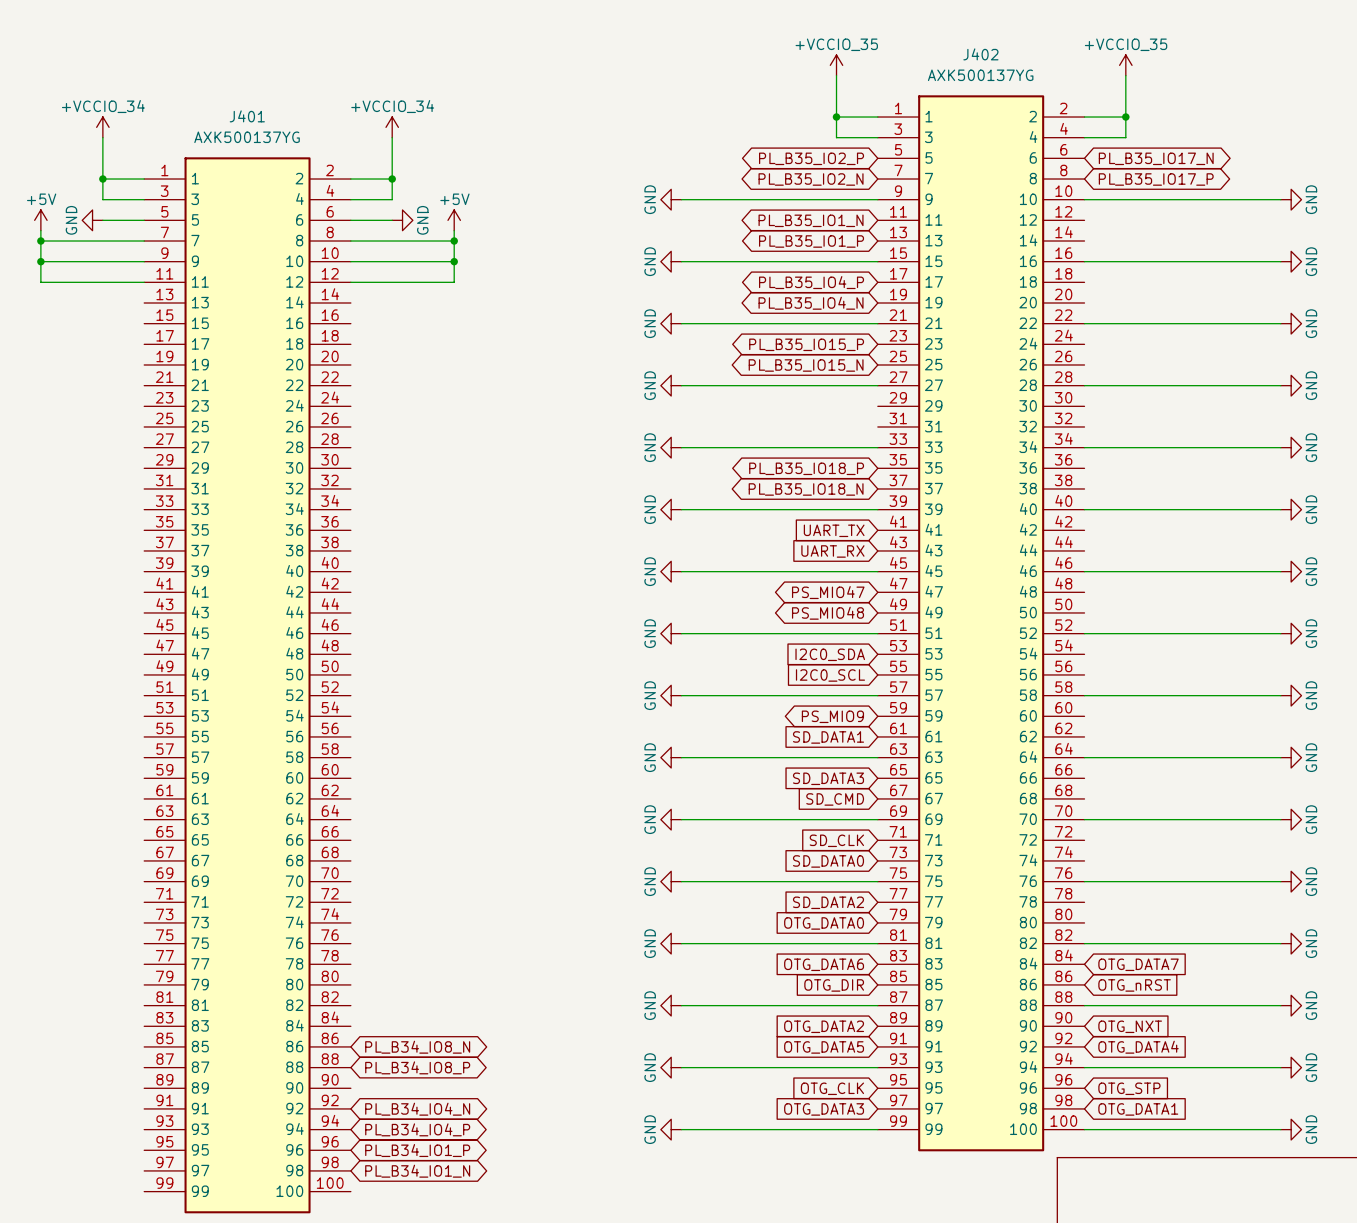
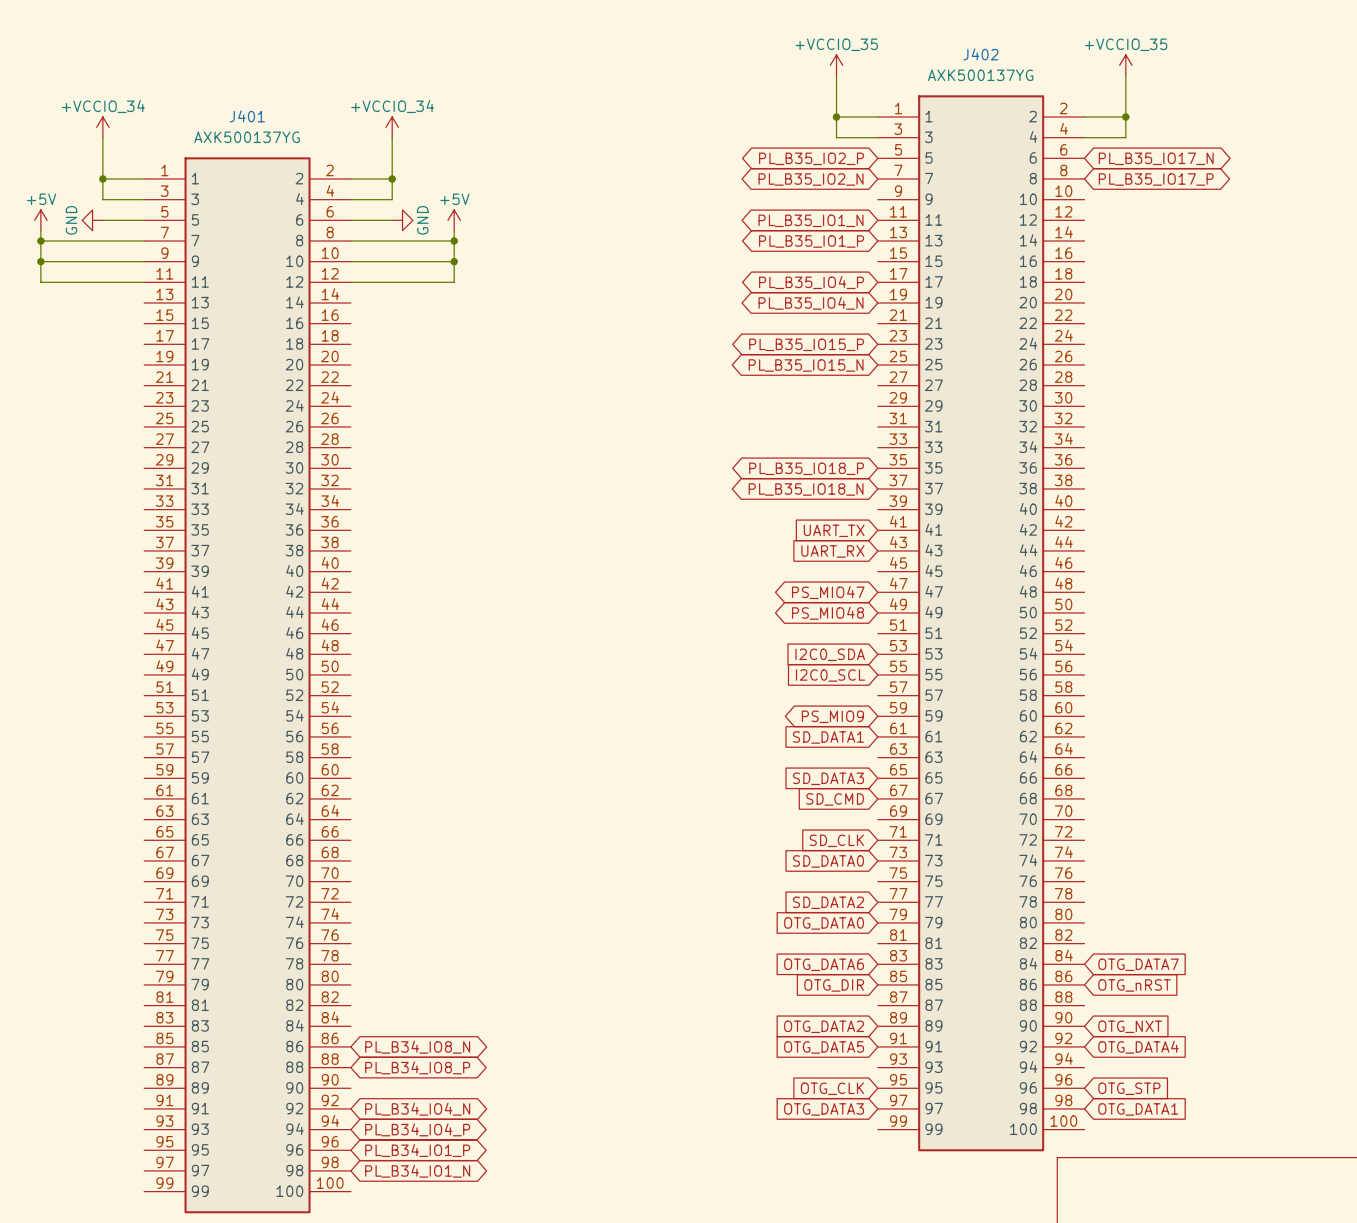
power symbol: GND (671, 199) -> none
wire: (681, 199) (877, 199) -> none
wire: (1084, 199) (1280, 199) -> none
power symbol: GND (1291, 199) -> none
power symbol: GND (671, 261) -> none
wire: (681, 261) (877, 261) -> none
wire: (1084, 261) (1280, 261) -> none
power symbol: GND (1291, 261) -> none
power symbol: GND (671, 323) -> none
wire: (681, 323) (877, 323) -> none
wire: (1084, 323) (1280, 323) -> none
power symbol: GND (1291, 323) -> none
power symbol: GND (671, 385) -> none
wire: (681, 385) (877, 385) -> none
wire: (1084, 385) (1280, 385) -> none
power symbol: GND (1291, 385) -> none
power symbol: GND (671, 447) -> none
wire: (681, 447) (877, 447) -> none
wire: (1084, 447) (1280, 447) -> none
power symbol: GND (1291, 447) -> none
power symbol: GND (671, 509) -> none
wire: (681, 509) (877, 509) -> none
wire: (1084, 509) (1280, 509) -> none
power symbol: GND (1291, 509) -> none
power symbol: GND (671, 571) -> none
wire: (681, 571) (877, 571) -> none
wire: (1084, 571) (1280, 571) -> none
power symbol: GND (1291, 571) -> none
power symbol: GND (671, 633) -> none
wire: (681, 633) (877, 633) -> none
wire: (1084, 633) (1280, 633) -> none
power symbol: GND (1291, 633) -> none
power symbol: GND (671, 695) -> none
wire: (681, 695) (877, 695) -> none
wire: (1084, 695) (1280, 695) -> none
power symbol: GND (1291, 695) -> none
power symbol: GND (671, 757) -> none
wire: (681, 757) (877, 757) -> none
wire: (1084, 757) (1280, 757) -> none
power symbol: GND (1291, 757) -> none
power symbol: GND (671, 819) -> none
wire: (681, 819) (877, 819) -> none
wire: (1084, 819) (1280, 819) -> none
power symbol: GND (1291, 819) -> none
power symbol: GND (671, 881) -> none
wire: (681, 881) (877, 881) -> none
wire: (1084, 881) (1280, 881) -> none
power symbol: GND (1291, 881) -> none
power symbol: GND (671, 943) -> none
wire: (681, 943) (877, 943) -> none
wire: (1084, 943) (1280, 943) -> none
power symbol: GND (1291, 943) -> none
power symbol: GND (671, 1005) -> none
wire: (681, 1005) (877, 1005) -> none
wire: (1084, 1005) (1280, 1005) -> none
power symbol: GND (1291, 1005) -> none
power symbol: GND (671, 1067) -> none
wire: (681, 1067) (877, 1067) -> none
wire: (1084, 1067) (1280, 1067) -> none
power symbol: GND (1291, 1067) -> none
power symbol: GND (671, 1129) -> none
wire: (681, 1129) (877, 1129) -> none
wire: (1084, 1129) (1280, 1129) -> none
power symbol: GND (1291, 1129) -> none

